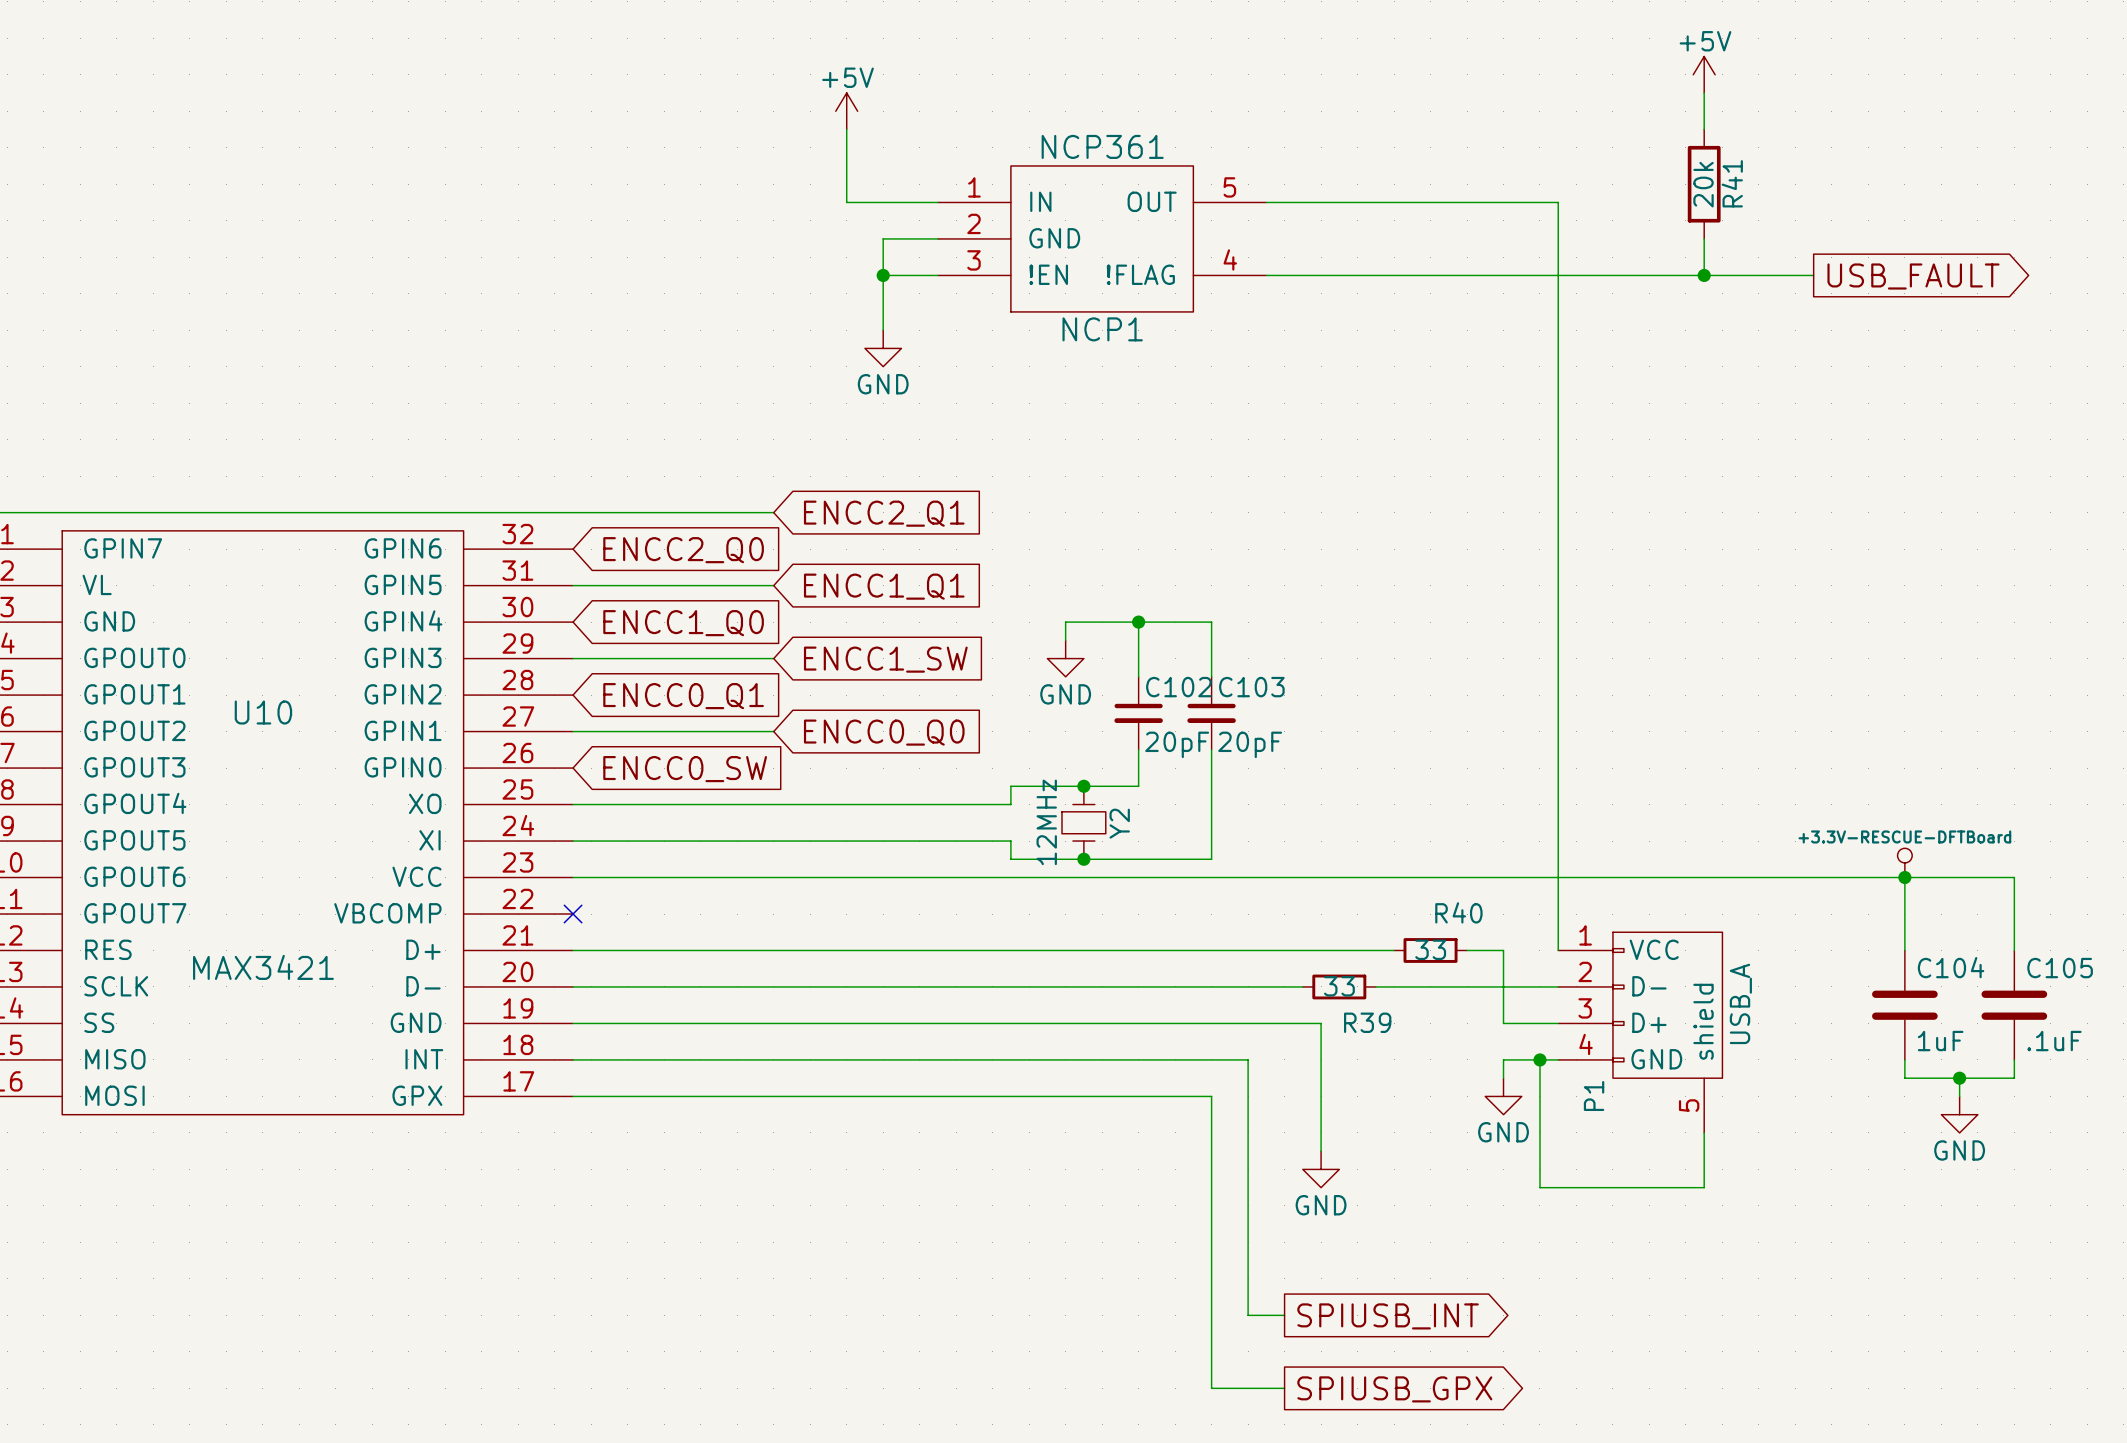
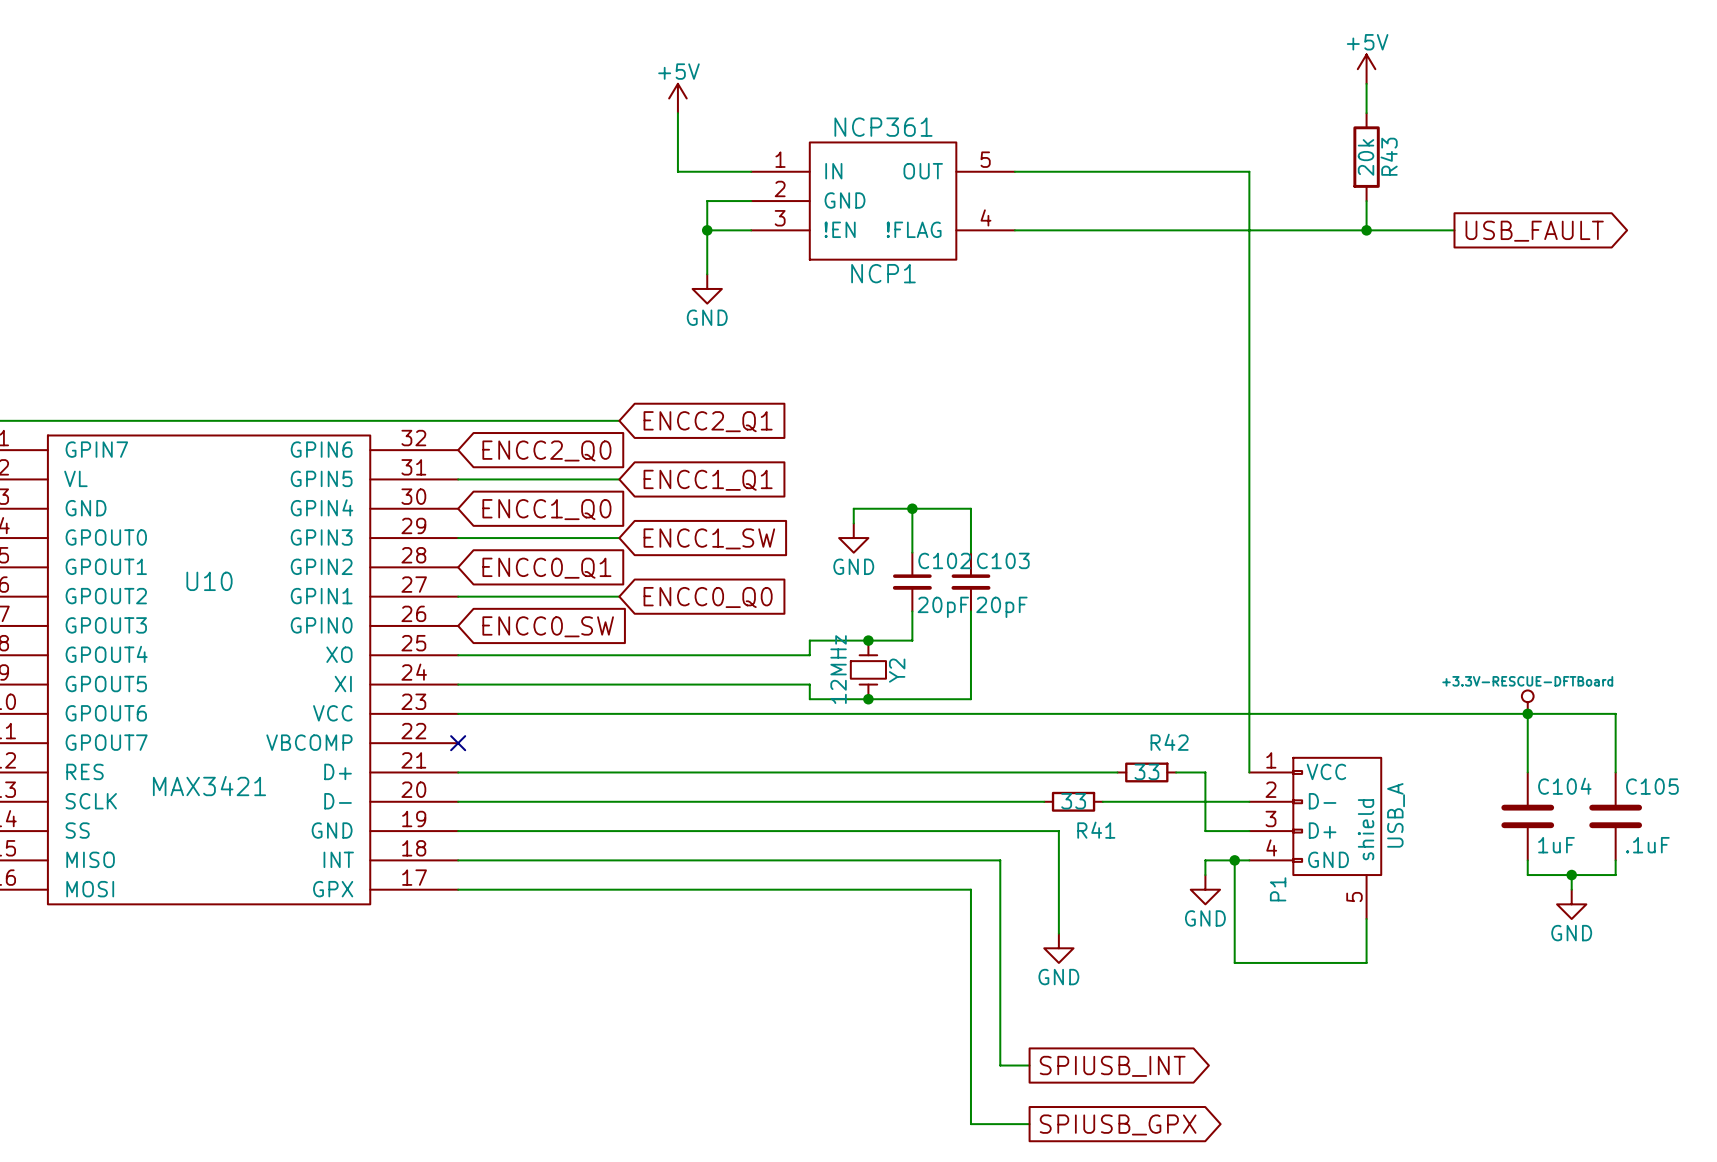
R41 name: R41 (1732, 183) -> R43 (1389, 156)
R40 name: R40 (1458, 912) -> R42 (1169, 742)
R39 name: R39 (1367, 1022) -> R41 (1096, 830)

